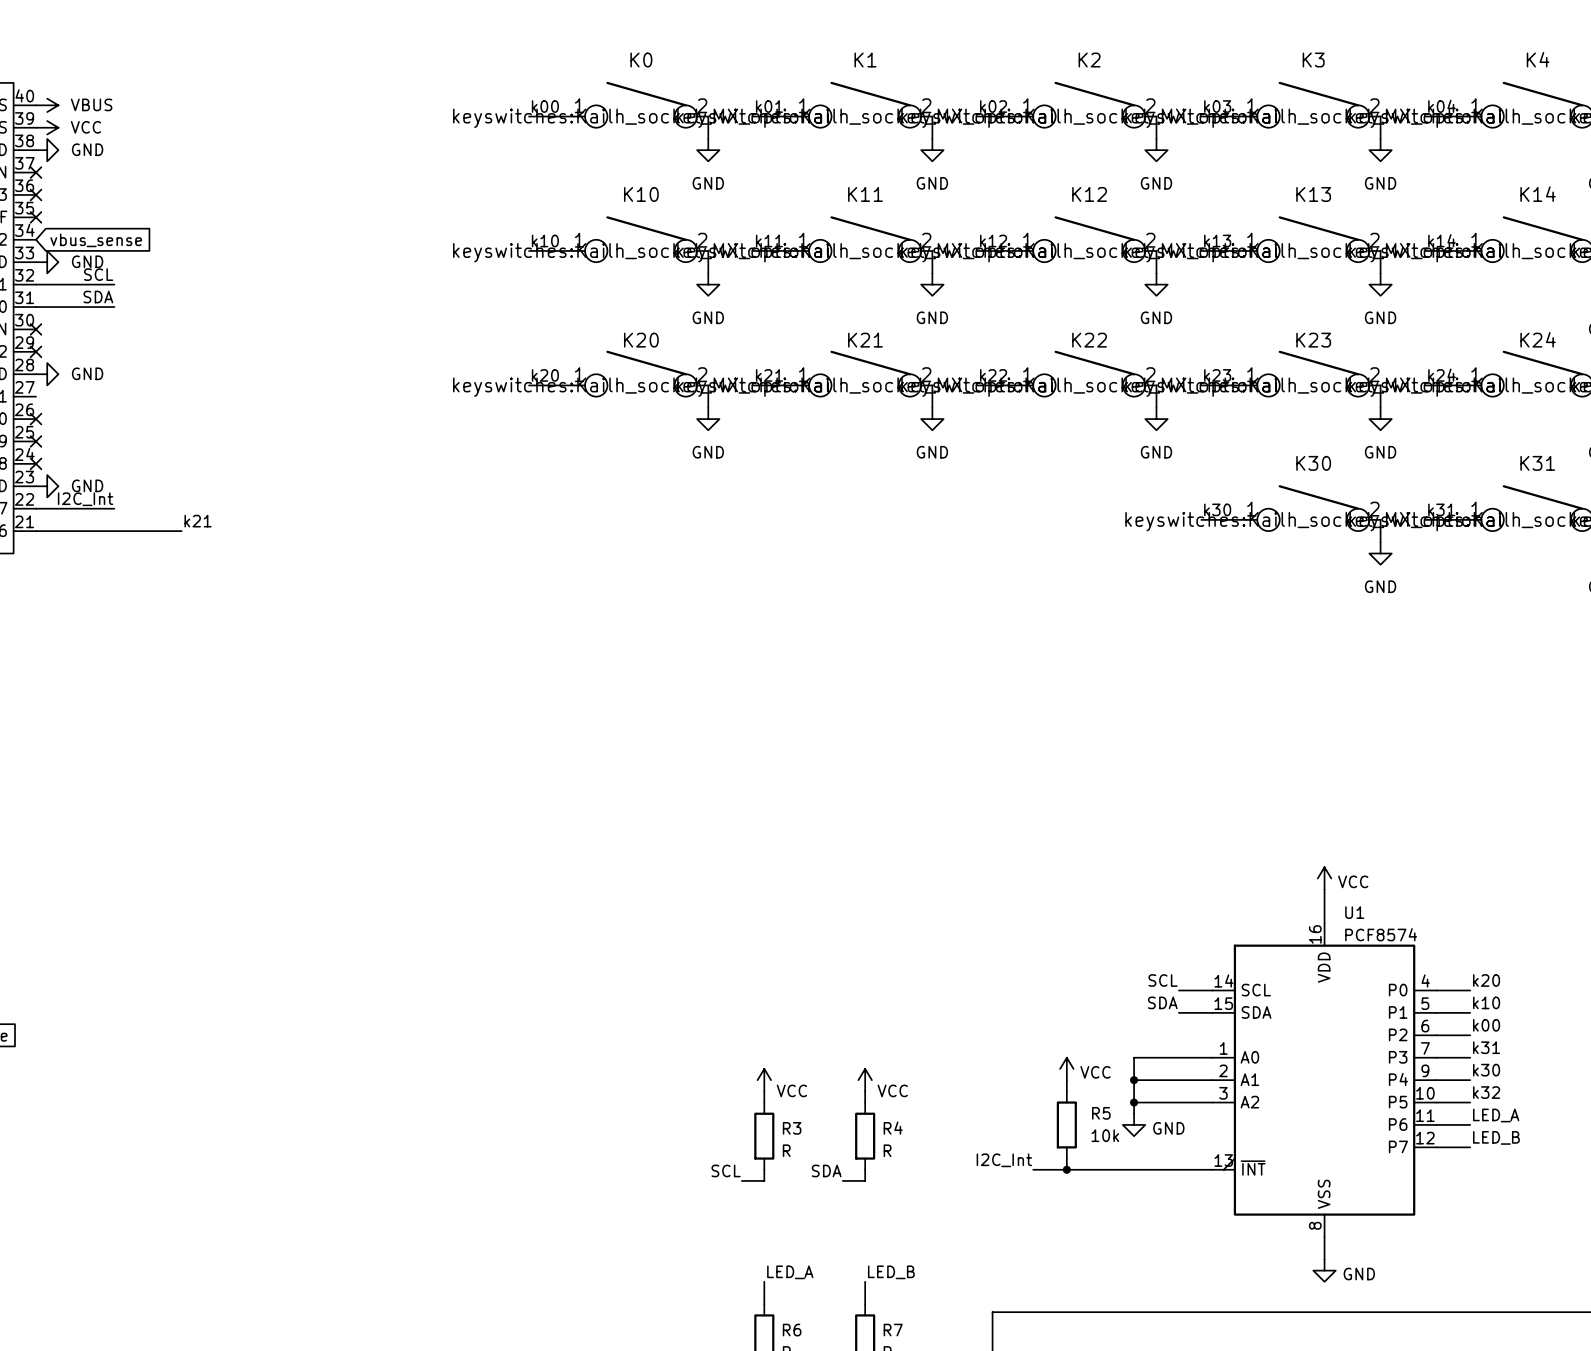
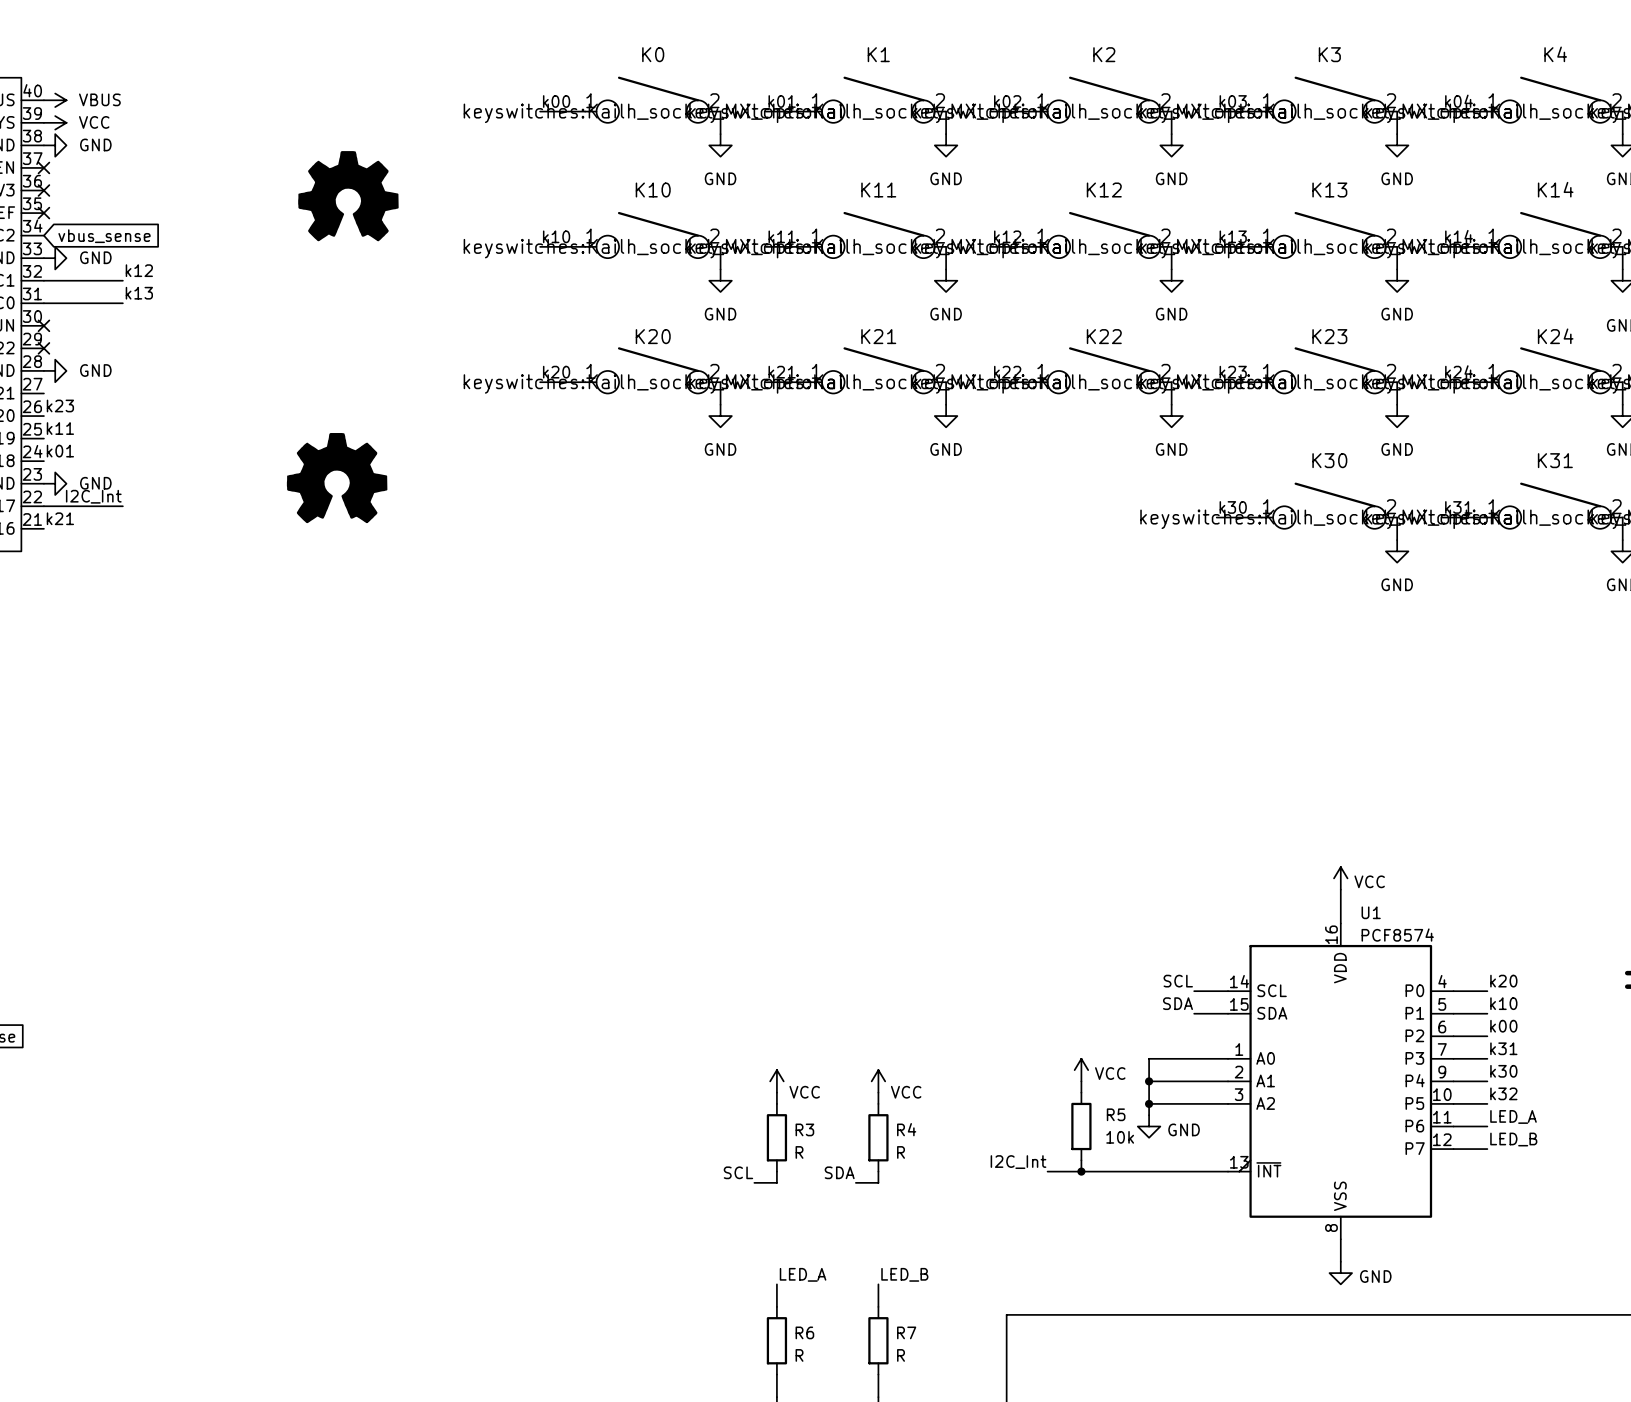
power symbol: none -> (348, 196)
label: SCL (98, 274) -> k12 (139, 270)
label: SDA (98, 297) -> k13 (139, 293)
label: none -> k23 (60, 405)
no-connect mark: (36, 419) -> none
label: none -> k11 (60, 428)
no-connect mark: (36, 441) -> none
label: none -> k01 (60, 451)
no-connect mark: (36, 463) -> none
power symbol: none -> (337, 478)
label position: k21 (198, 521) -> k21 (60, 518)
wire: (36, 531) (181, 531) -> none

